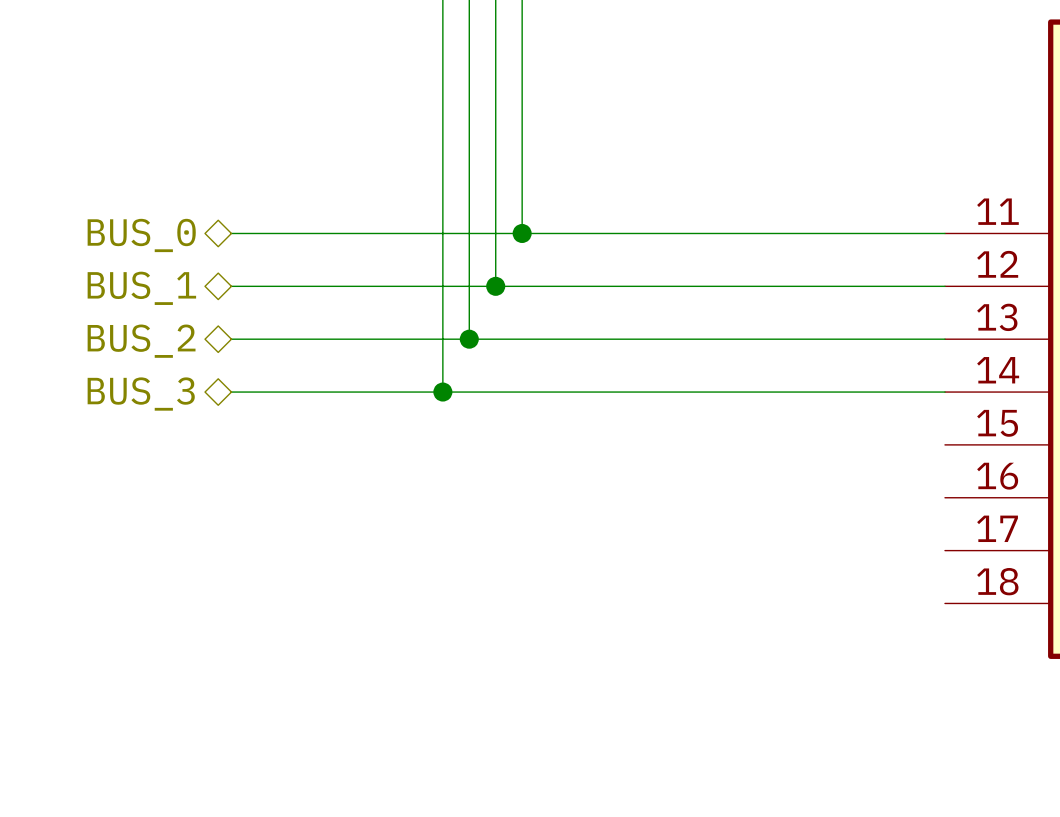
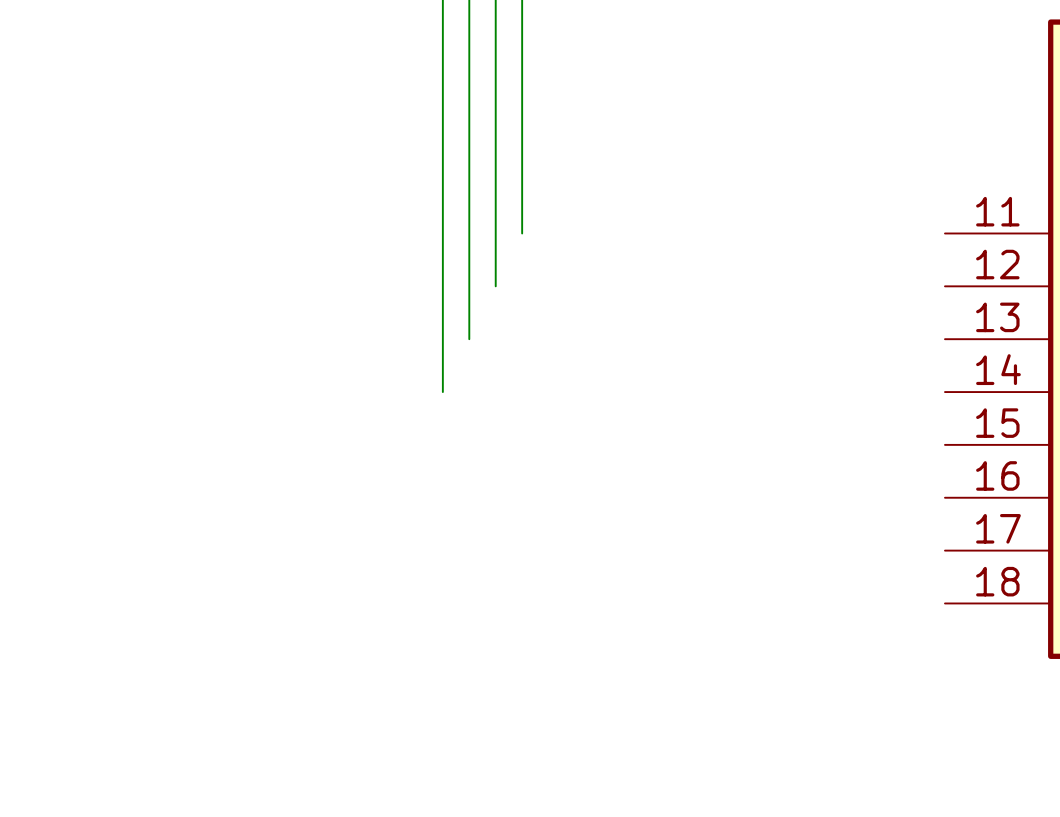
wire: (231, 233) (944, 233) -> none
junction: (522, 233) -> none
hierarchical label: BUS_0 (141, 235) -> none
wire: (231, 286) (944, 286) -> none
junction: (495, 286) -> none
hierarchical label: BUS_1 (141, 288) -> none
wire: (231, 339) (944, 339) -> none
junction: (469, 339) -> none
hierarchical label: BUS_2 (141, 341) -> none
wire: (231, 392) (944, 392) -> none
junction: (442, 392) -> none
hierarchical label: BUS_3 (141, 394) -> none

